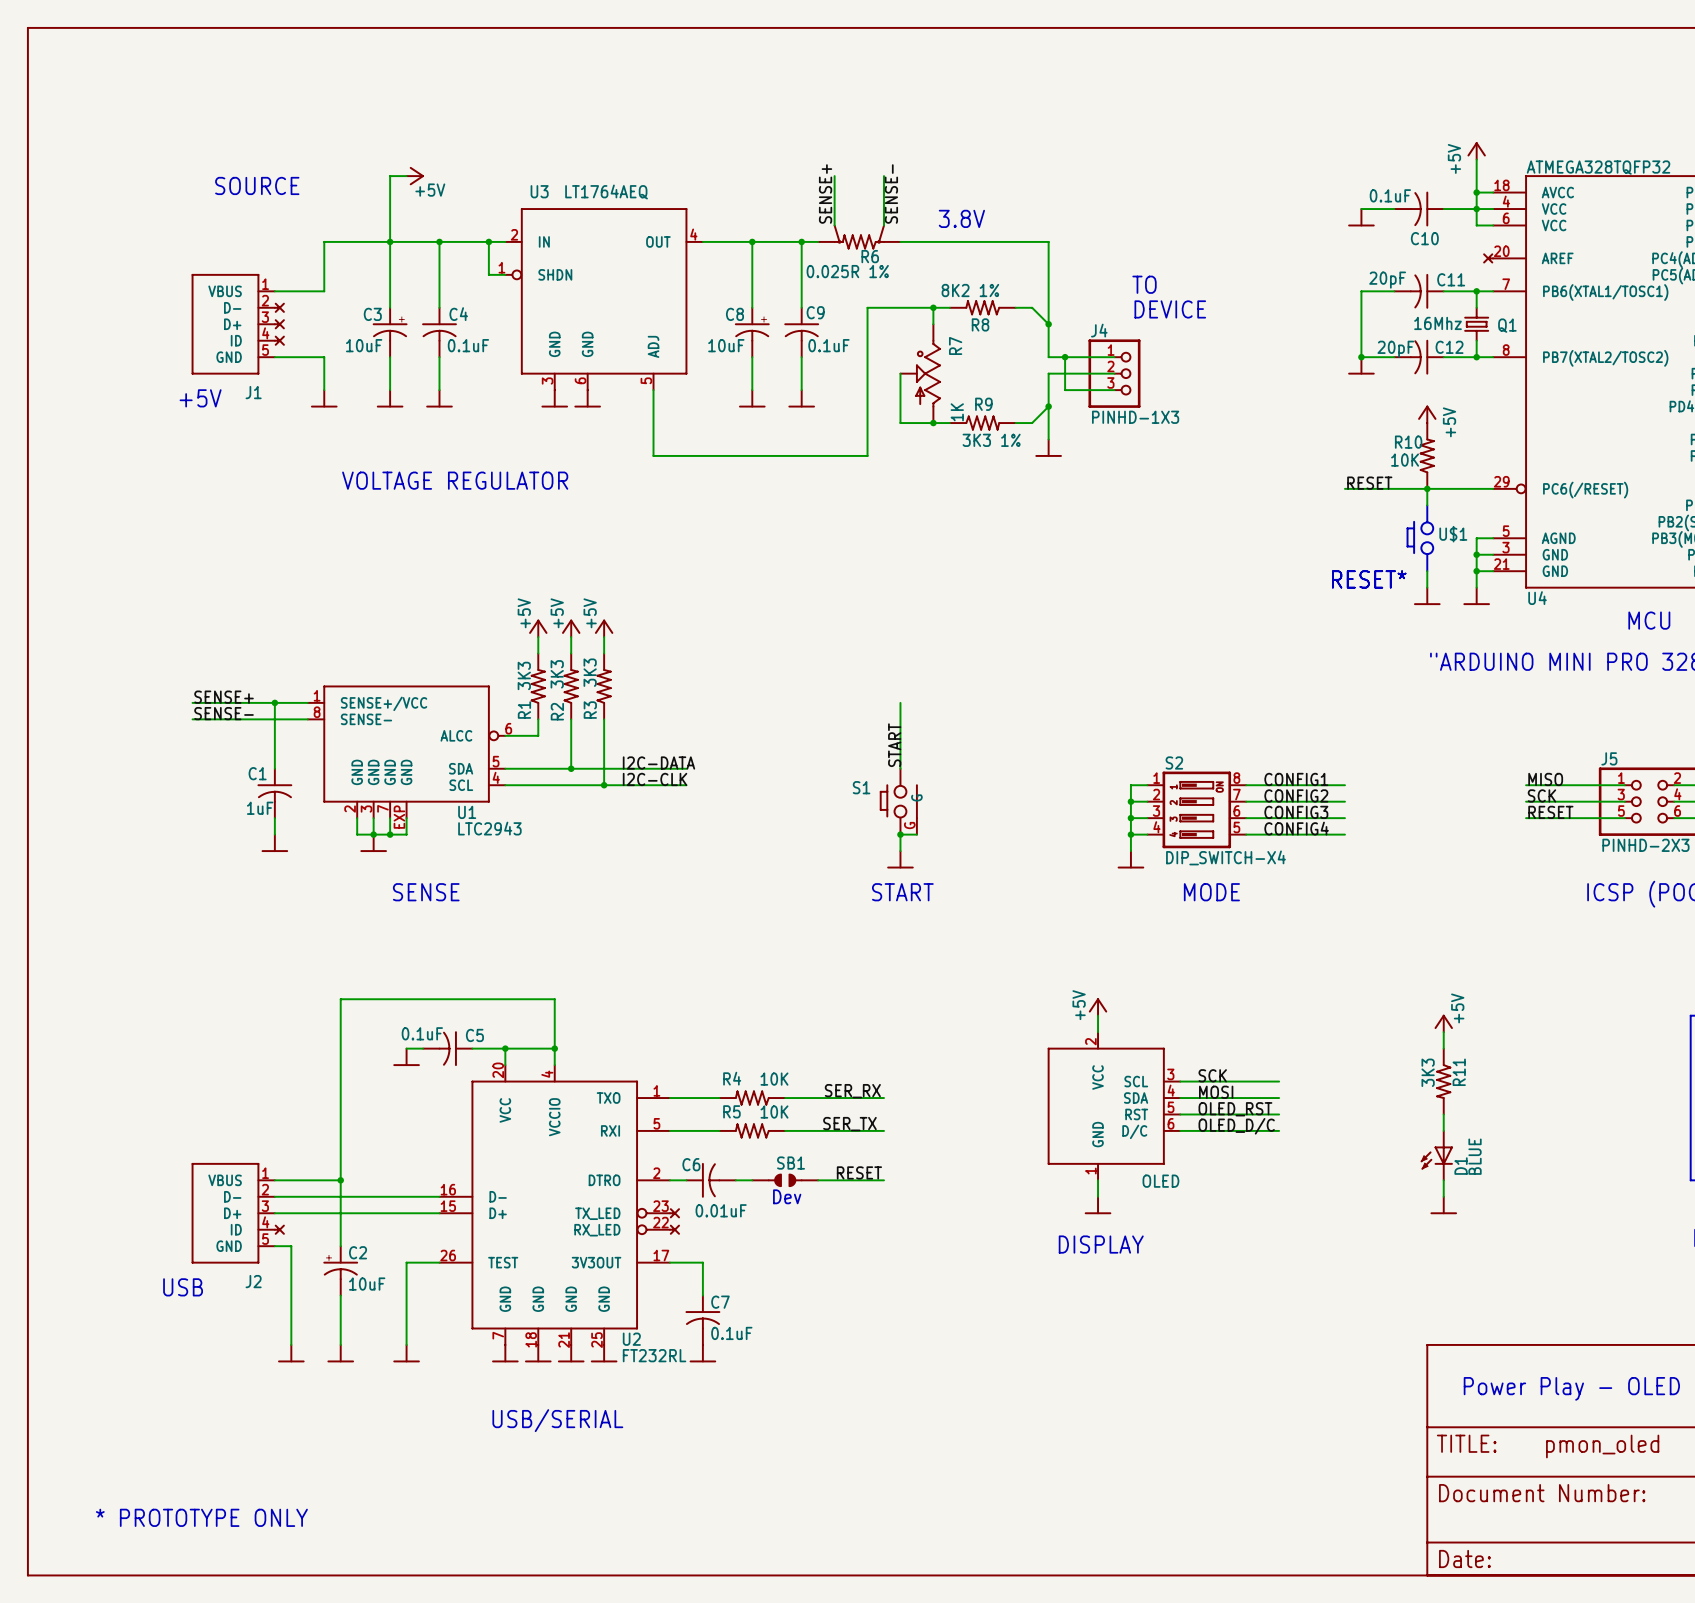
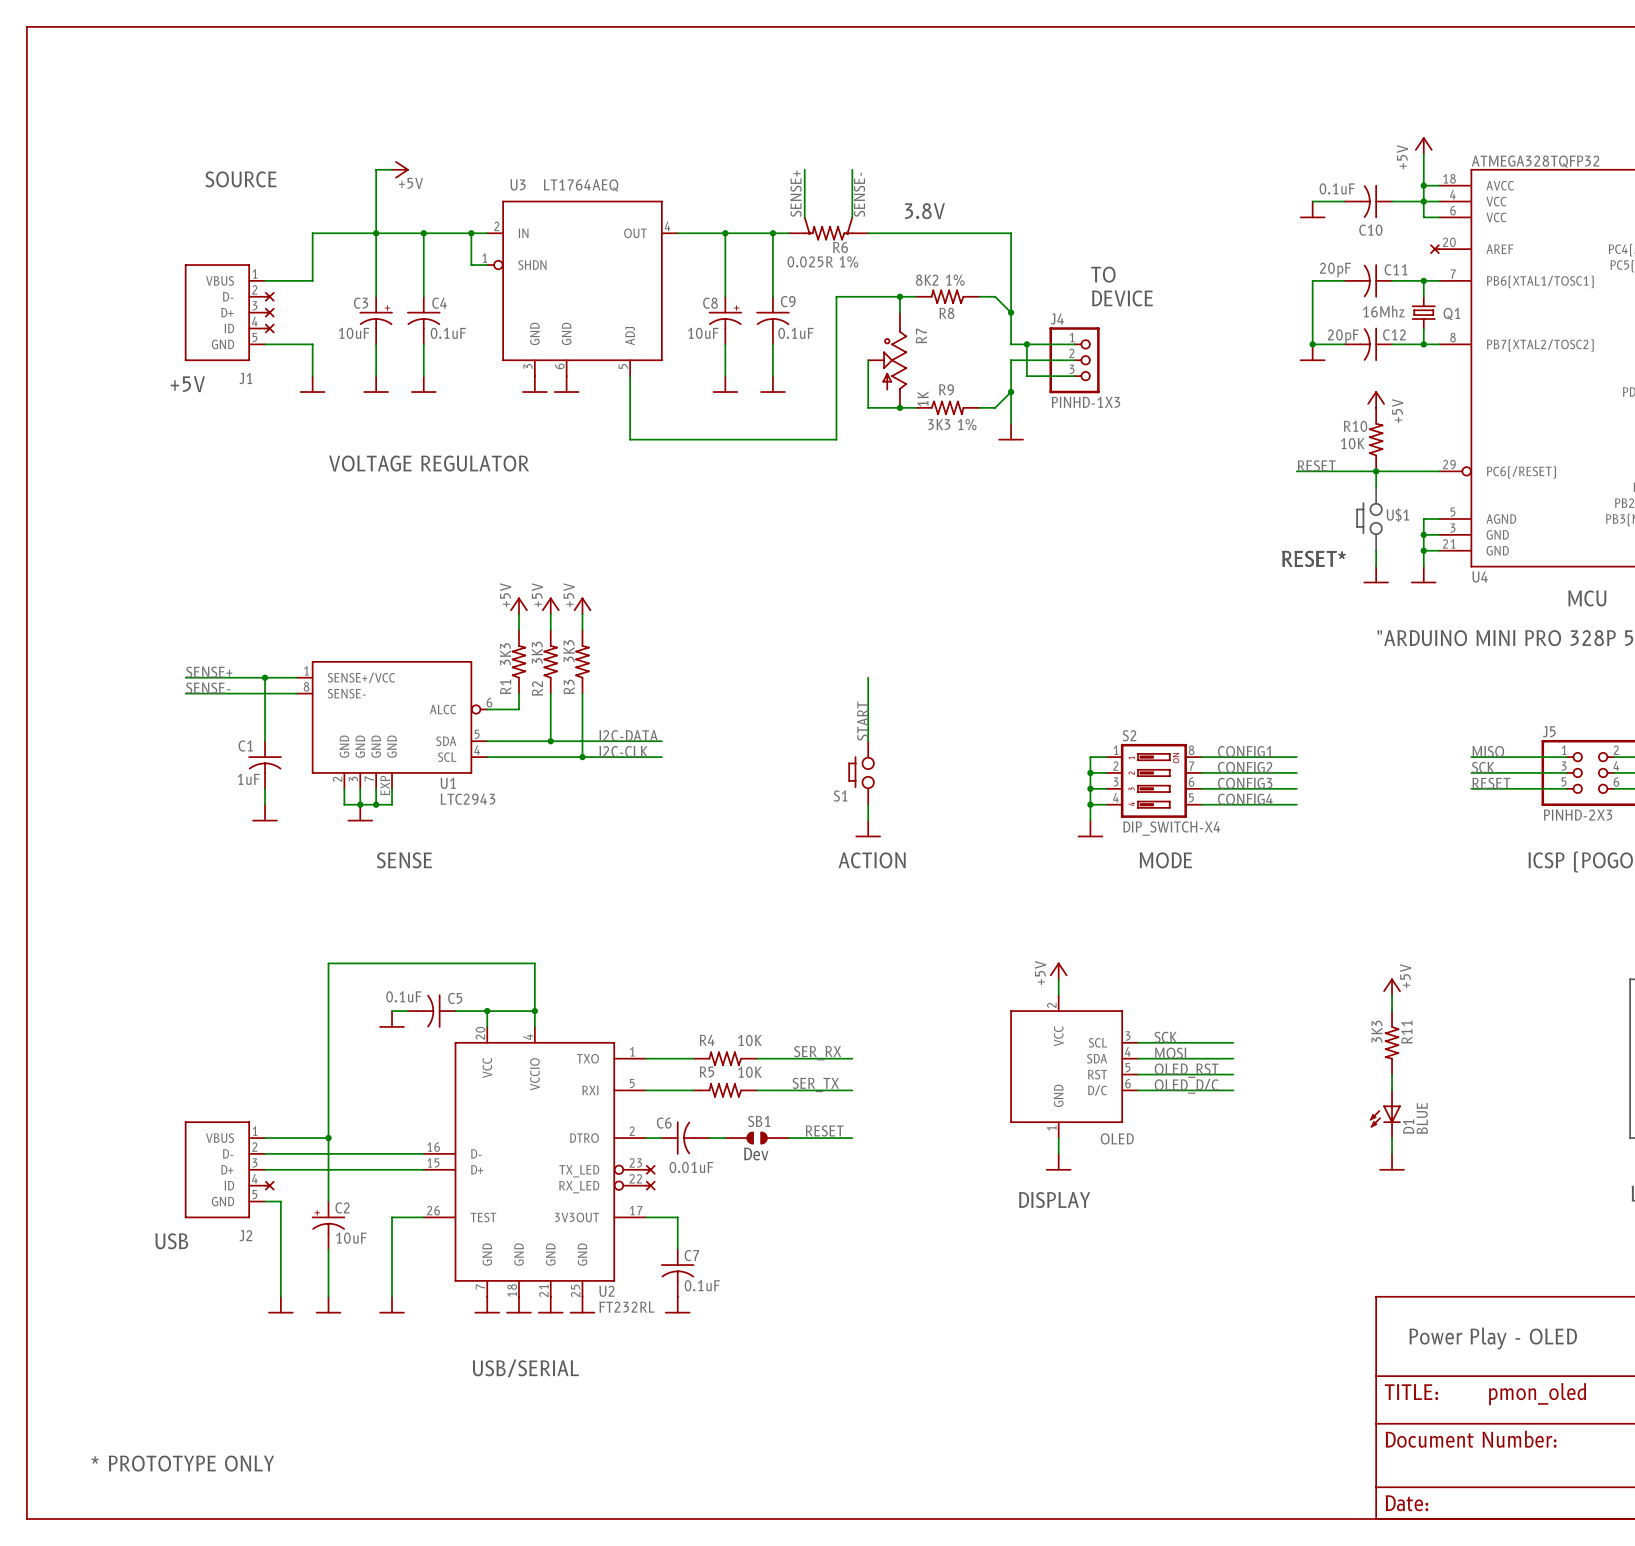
S1 symbol: [879, 768, 918, 835] -> [848, 741, 875, 805]
S1 name position: S1 (861, 787) -> S1 (840, 796)
wire: (900, 834) (916, 834) -> none
junction: (900, 834) -> none
text: START (902, 892) -> ACTION (872, 860)

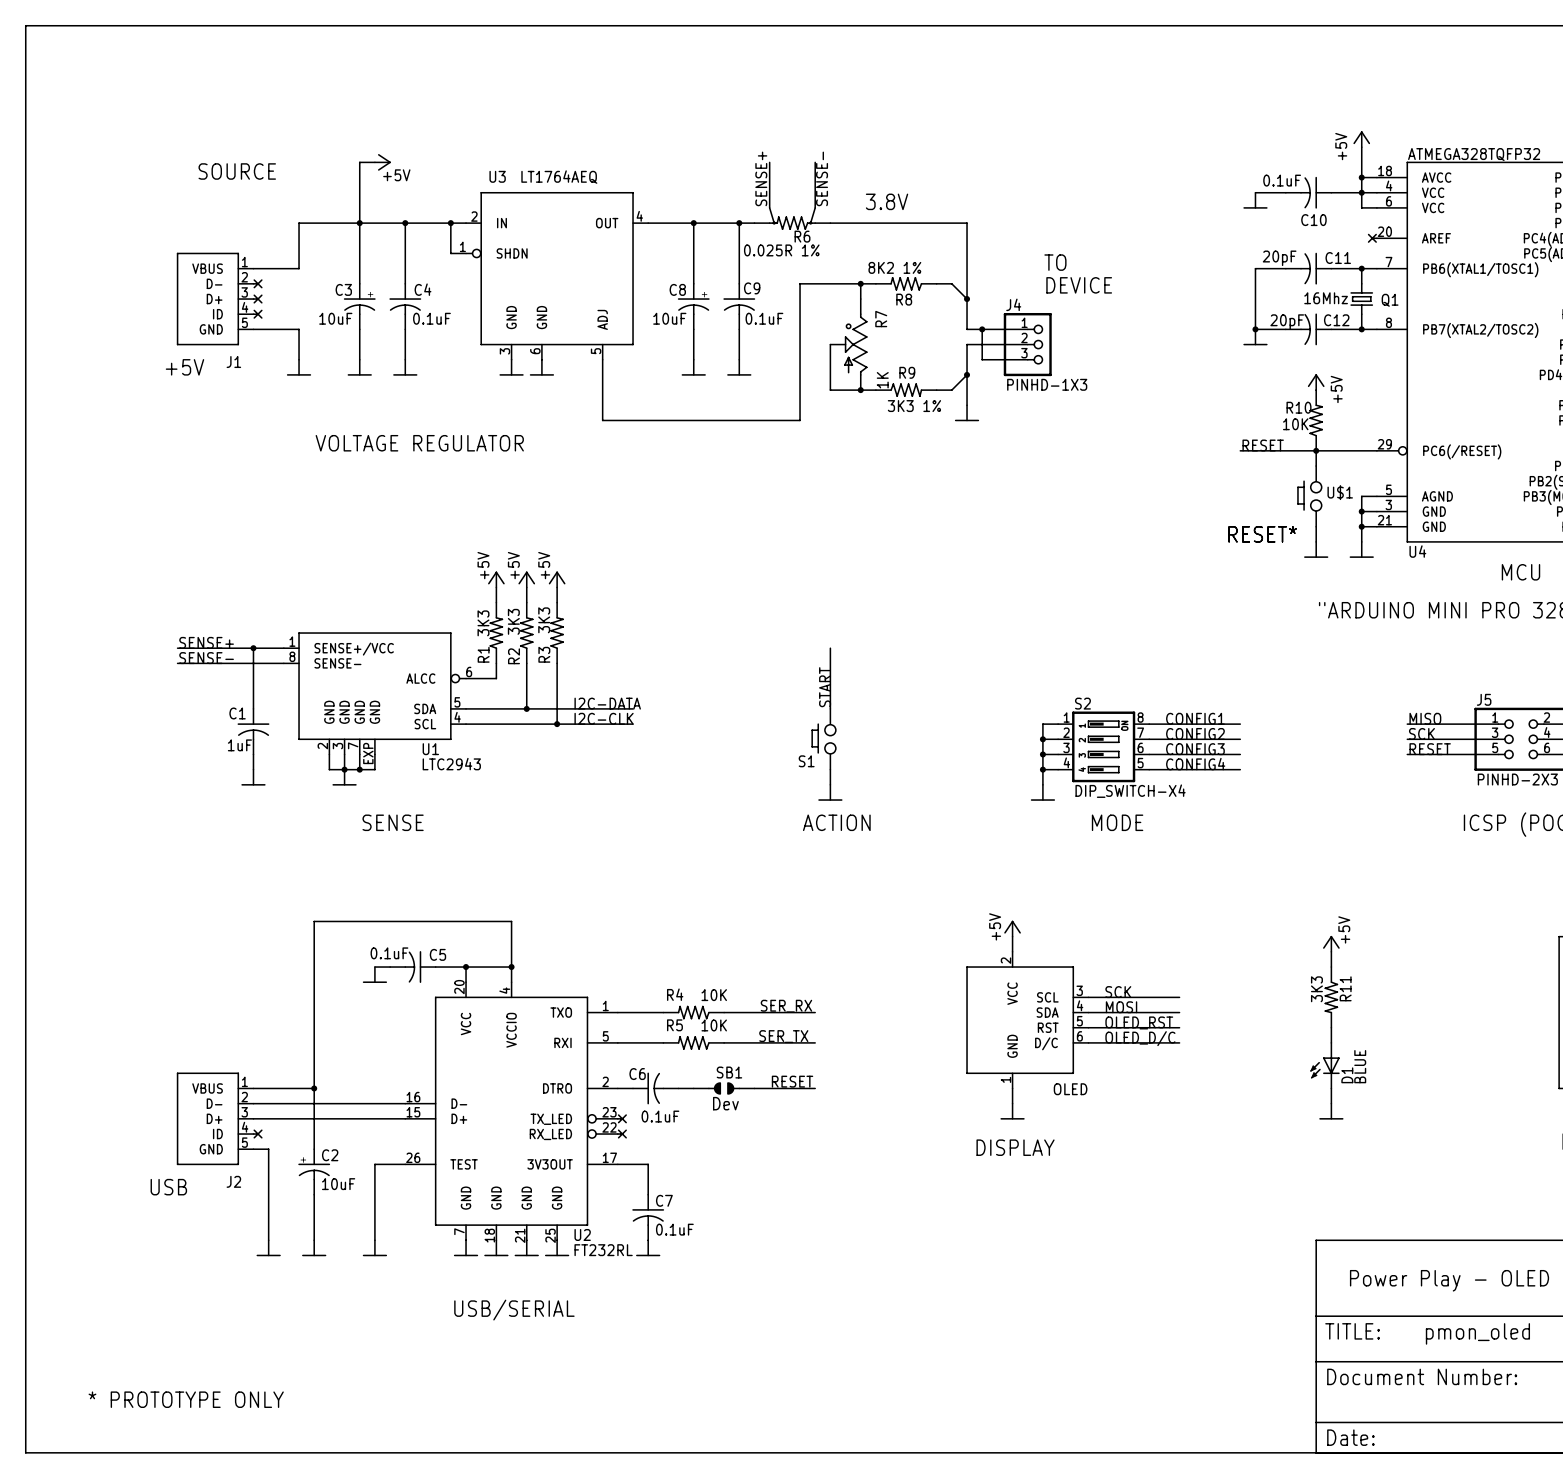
C6 value: 0.01uF (691, 1167) -> 0.1uF (660, 1116)

